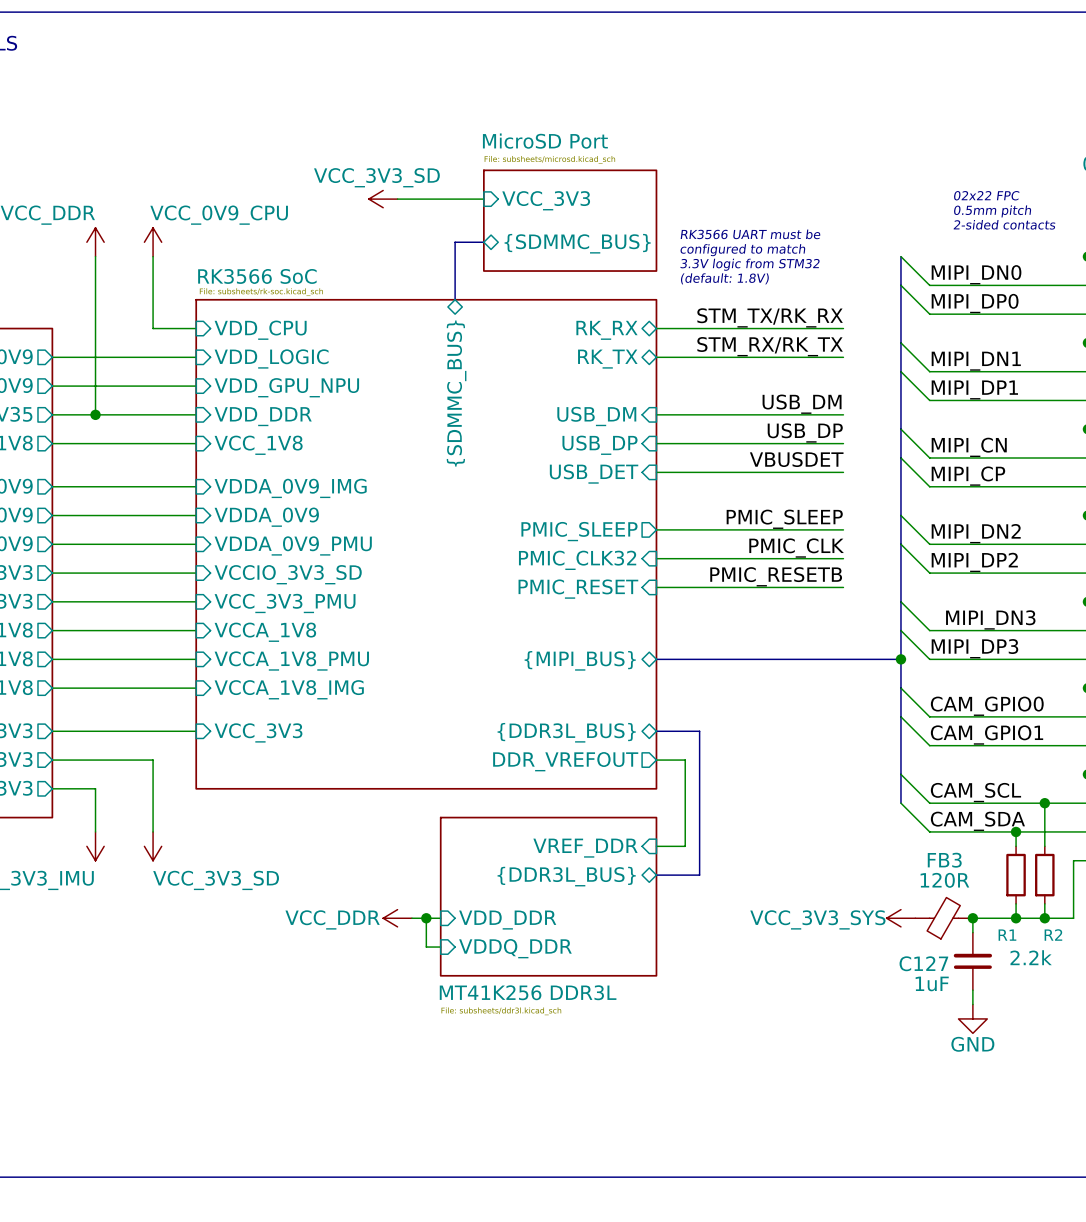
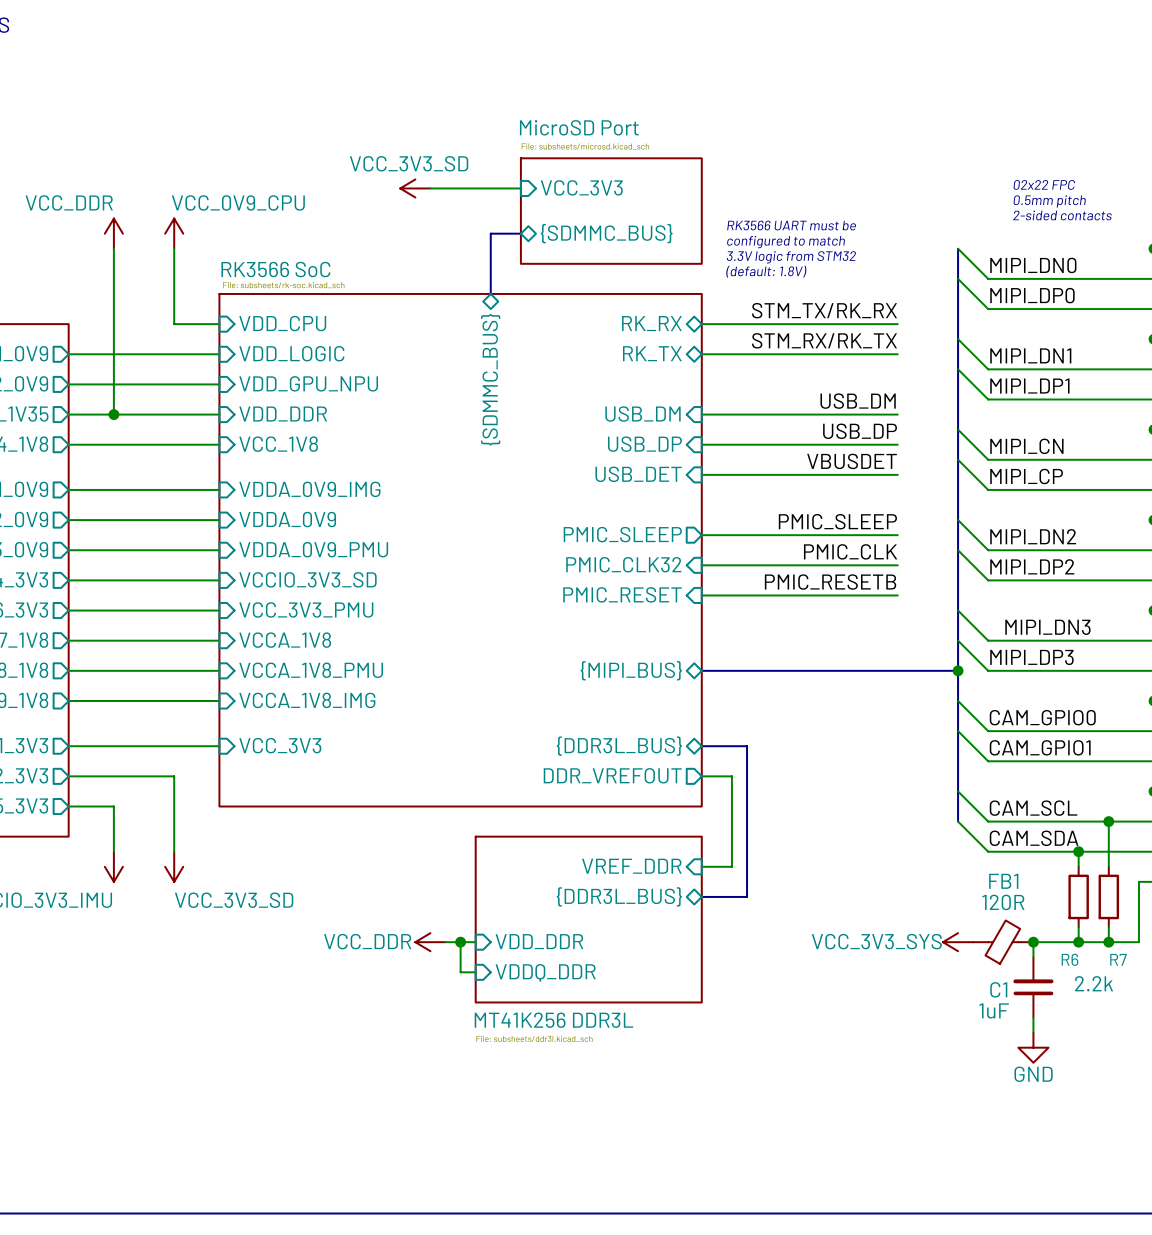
FB3 name: FB3 (944, 860) -> FB1 (1003, 881)
R1 name: R1 (1007, 935) -> R6 (1069, 959)
R2 name: R2 (1053, 935) -> R7 (1118, 959)
C127 name: C127 (923, 963) -> C1 (998, 989)

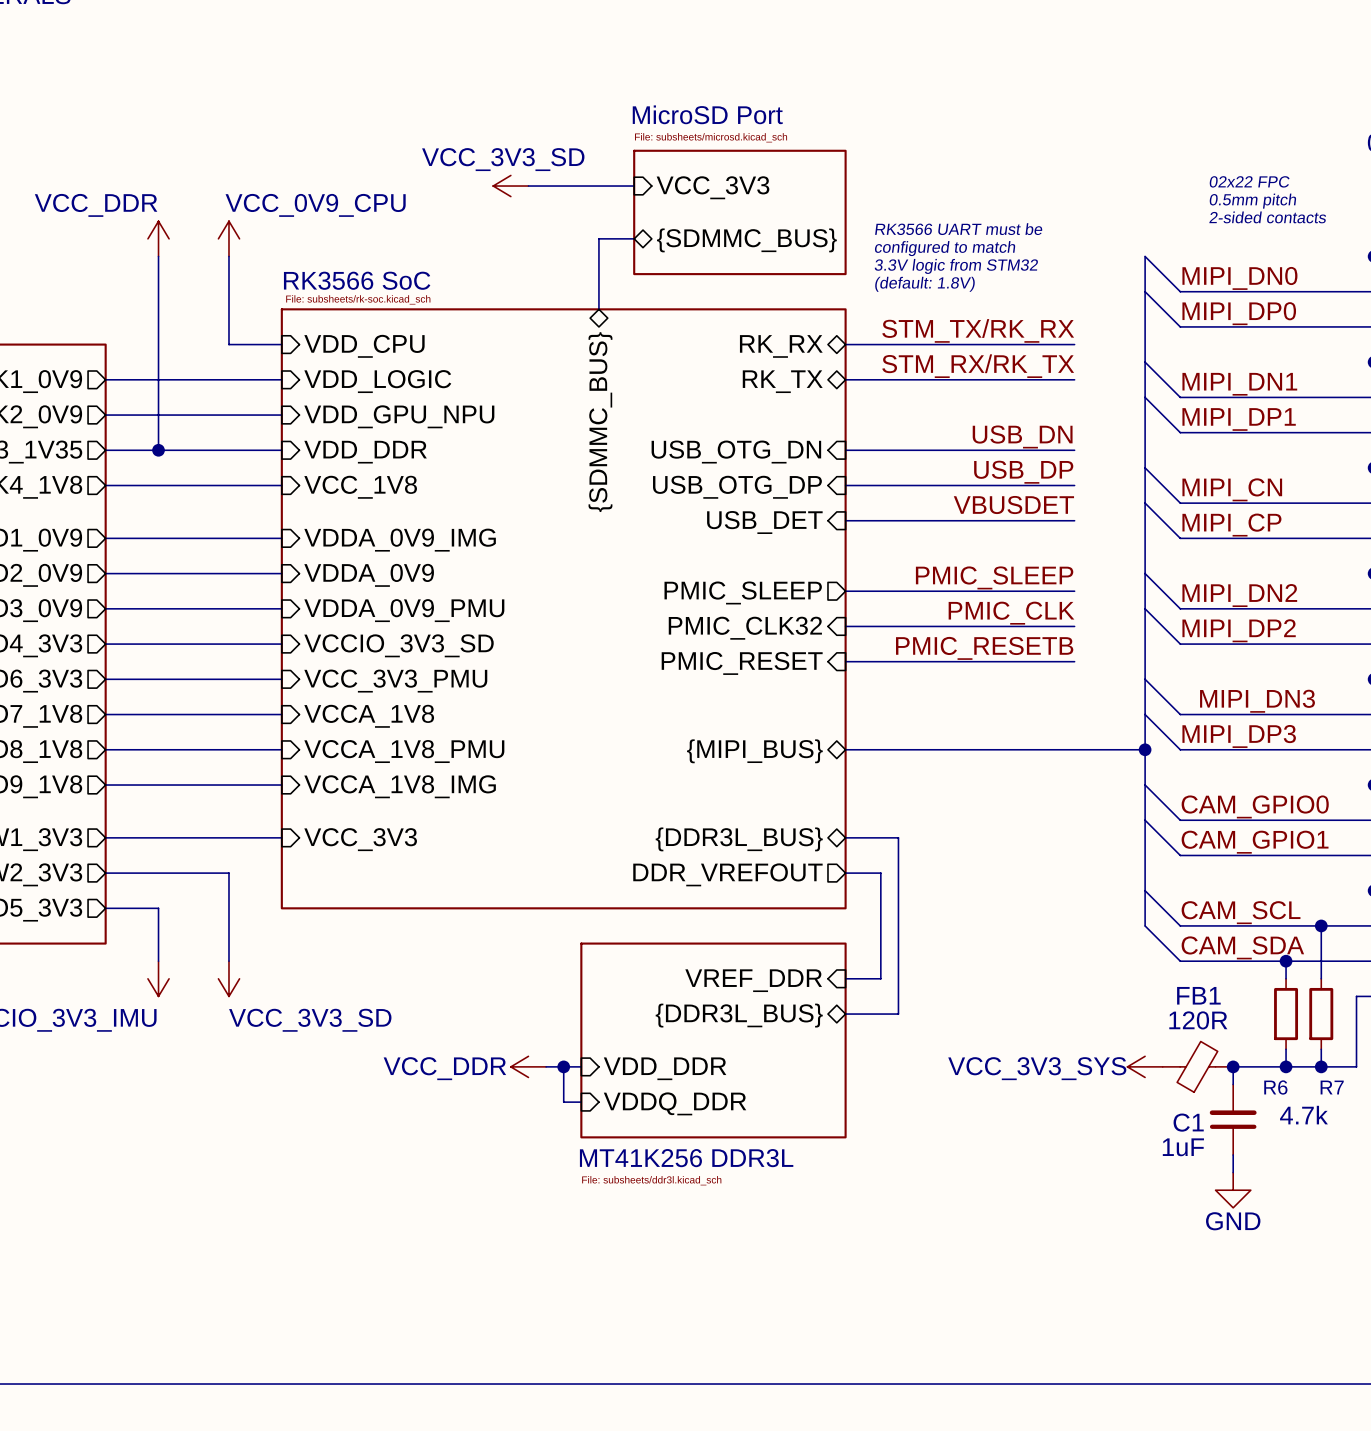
label: USB_DM (858, 401) -> USB_DN (1022, 436)
sheet pin: USB_DM (643, 414) -> USB_OTG_DN (736, 452)
sheet pin: USB_DP (644, 444) -> USB_OTG_DP (737, 487)
R6 value: 2.2k (1094, 983) -> 4.7k (1303, 1115)

